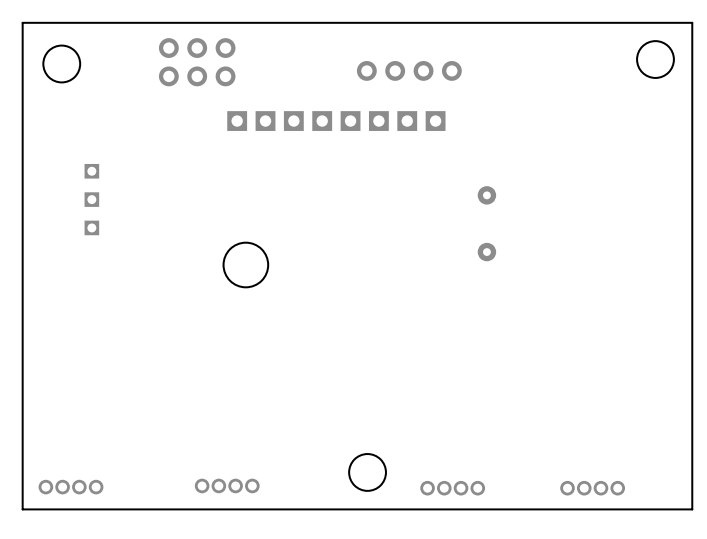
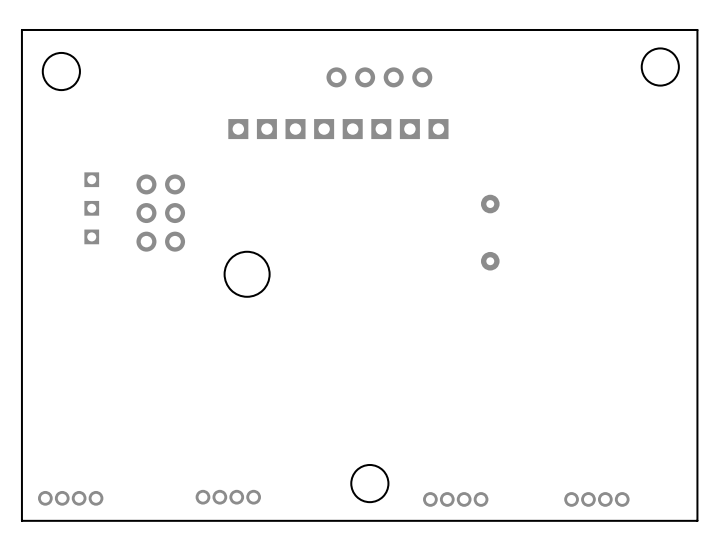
part rotation: 0° (197, 62) -> 90° clockwise (160, 213)
part position: (197, 62) -> (160, 213)
part position: (409, 70) -> (379, 77)

